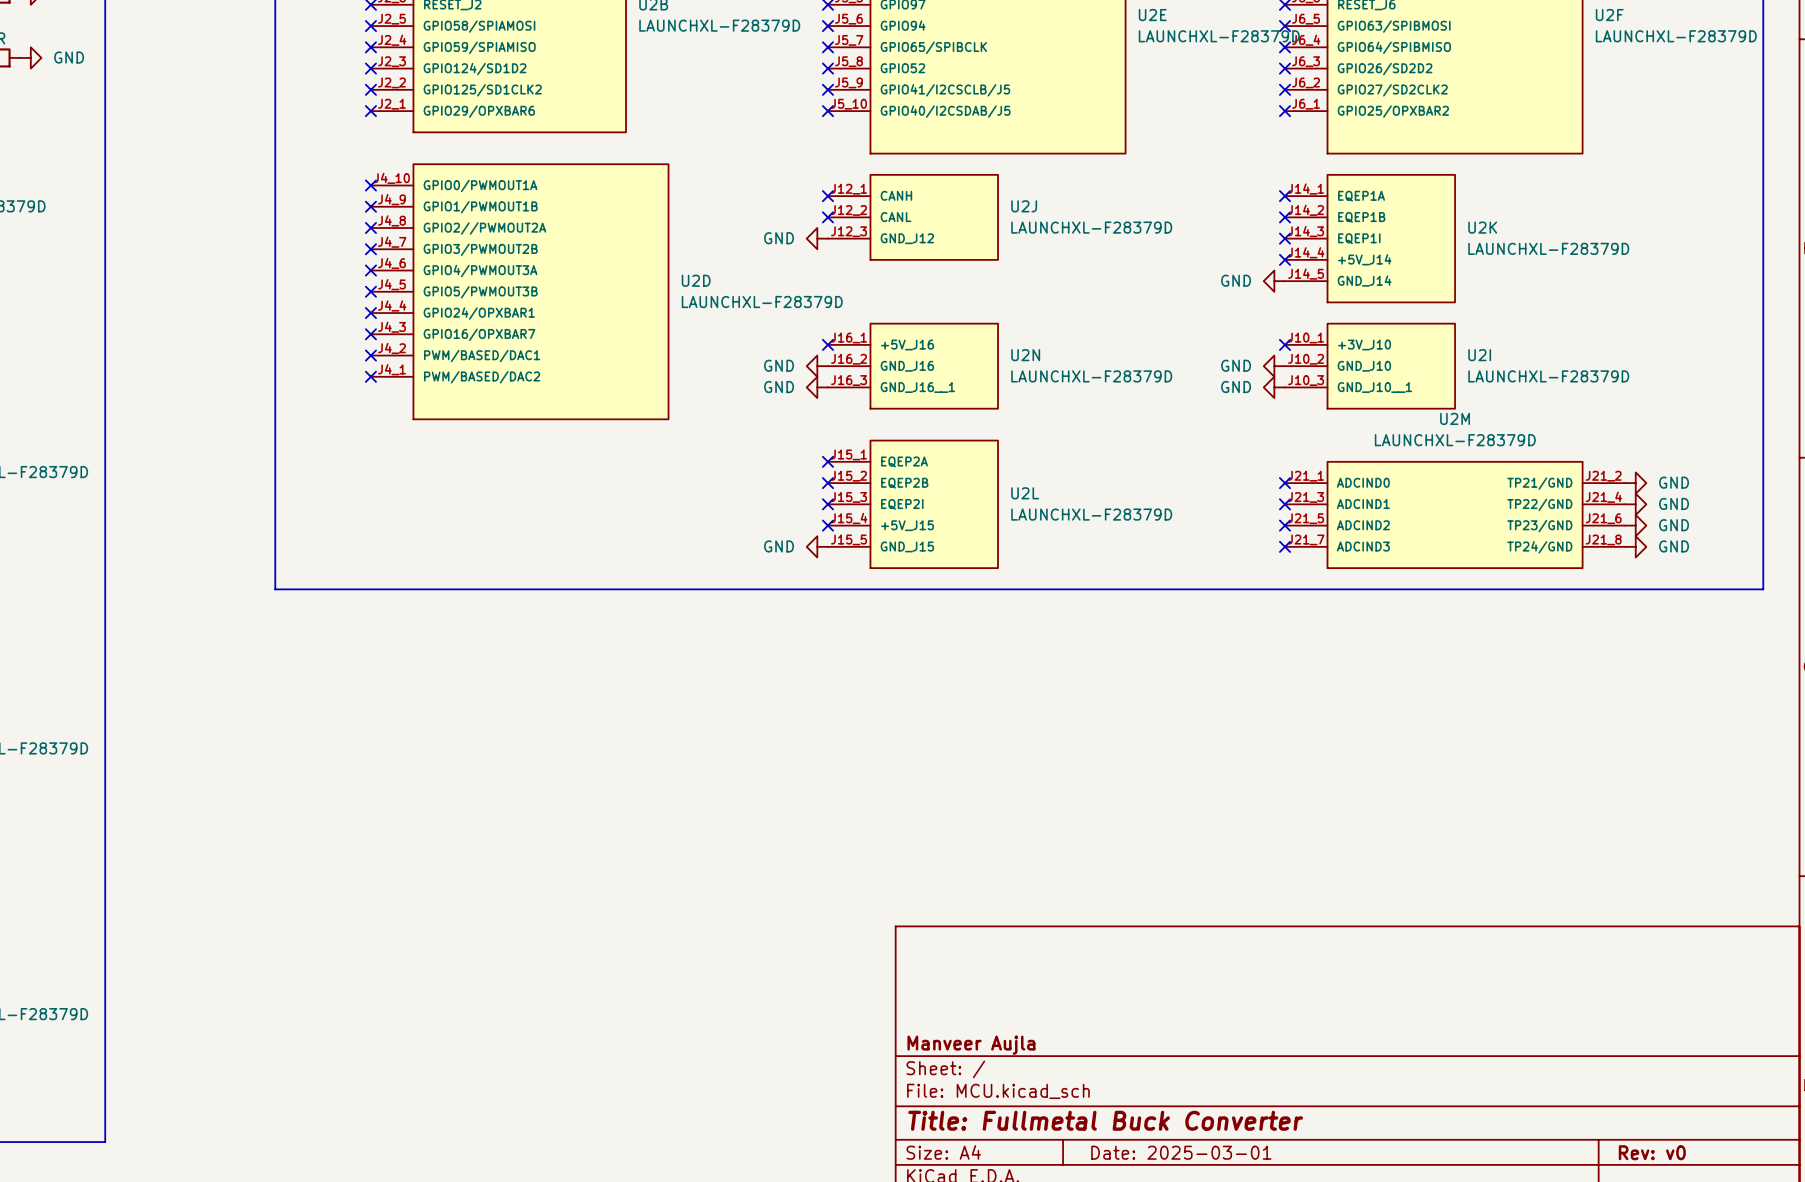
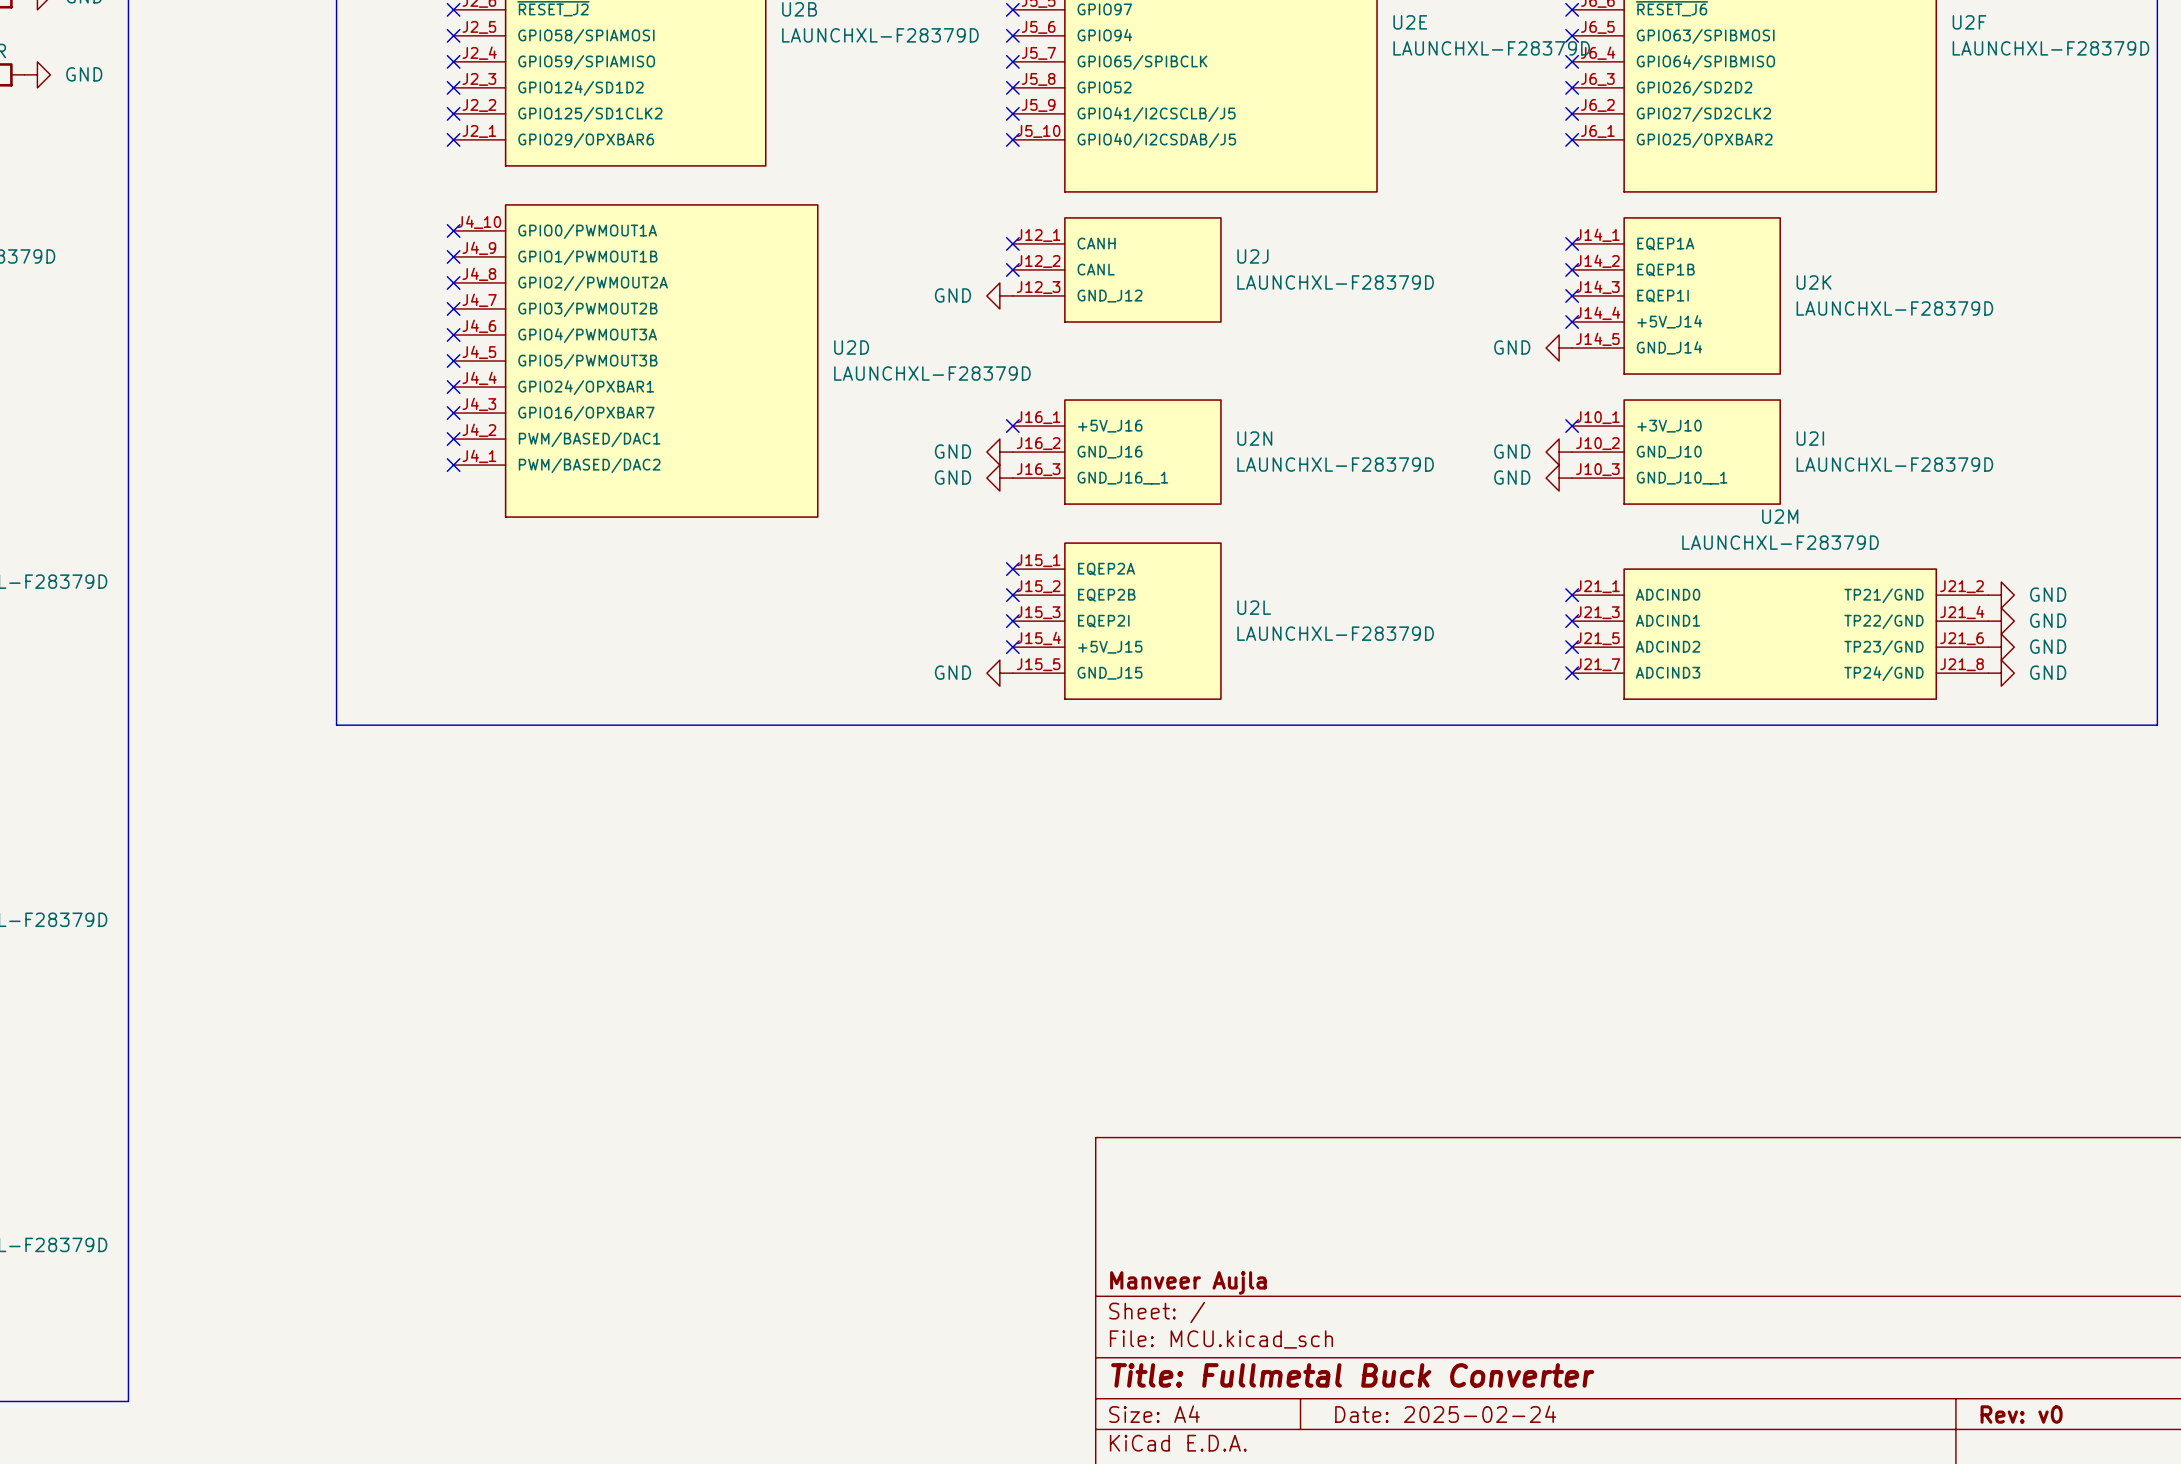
title block: Date: 2025-03-01 (1181, 1152) -> Date: 2025-02-24 (1445, 1414)

